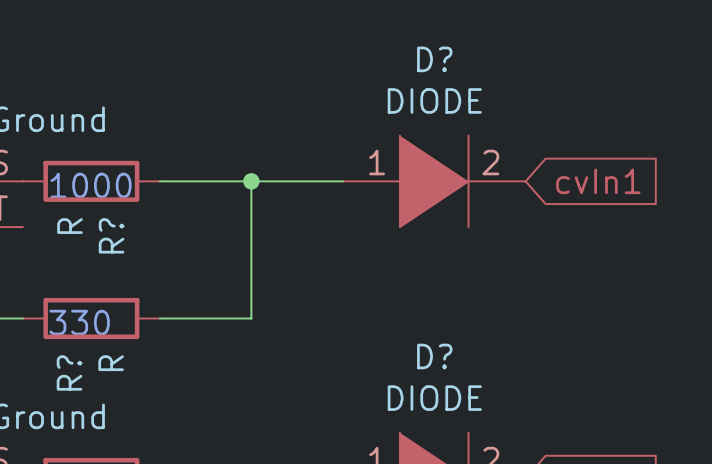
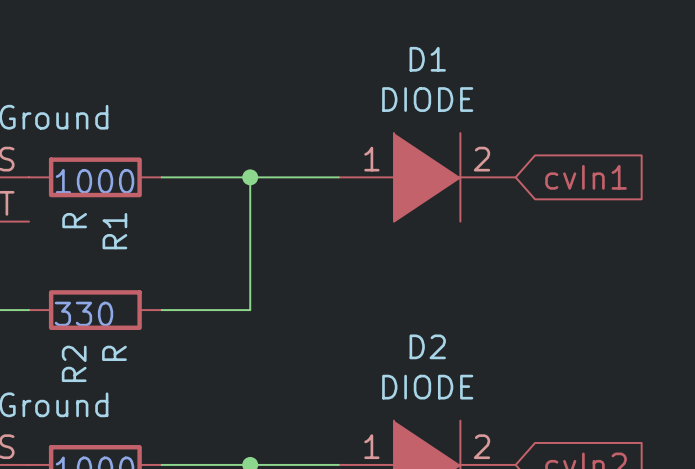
D? name: D? (434, 59) -> D1 (427, 59)
R? name: R? (111, 235) -> R1 (114, 231)
D? name: D? (434, 356) -> D2 (427, 346)
R? name: R? (69, 372) -> R2 (74, 363)

